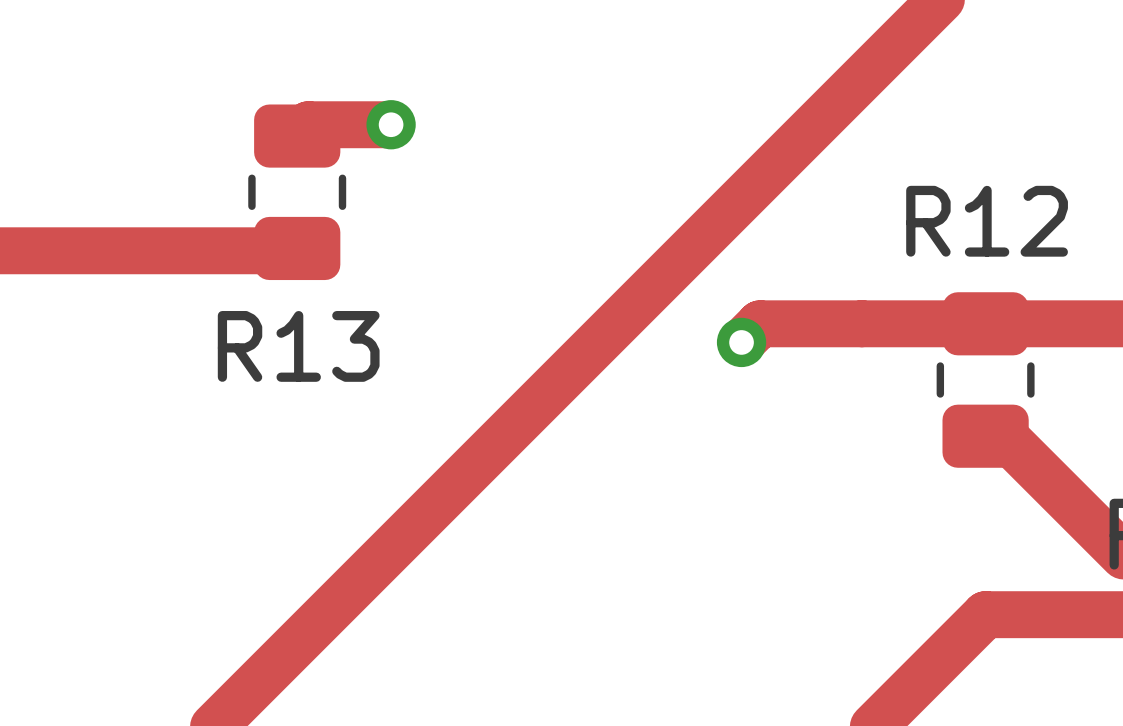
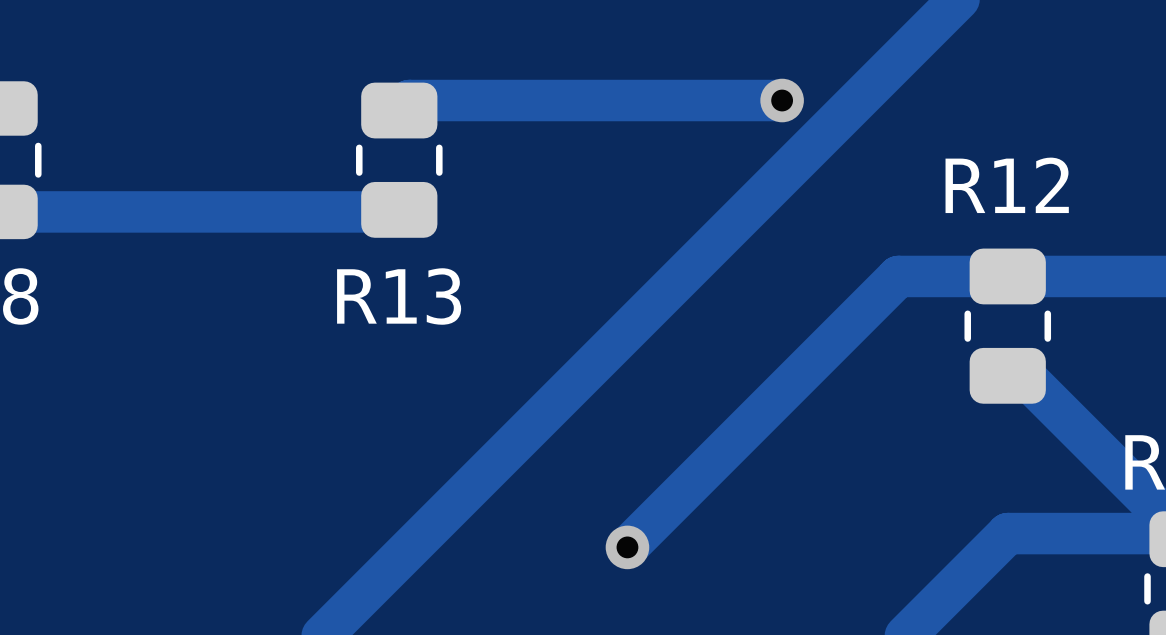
track: none -> (482, 100) (782, 100)
via: (391, 124) -> none
via: none -> (782, 100)
track: (861, 323) (760, 323) (741, 342) -> (898, 276) (627, 547)
via: (741, 342) -> none
via: none -> (627, 547)

